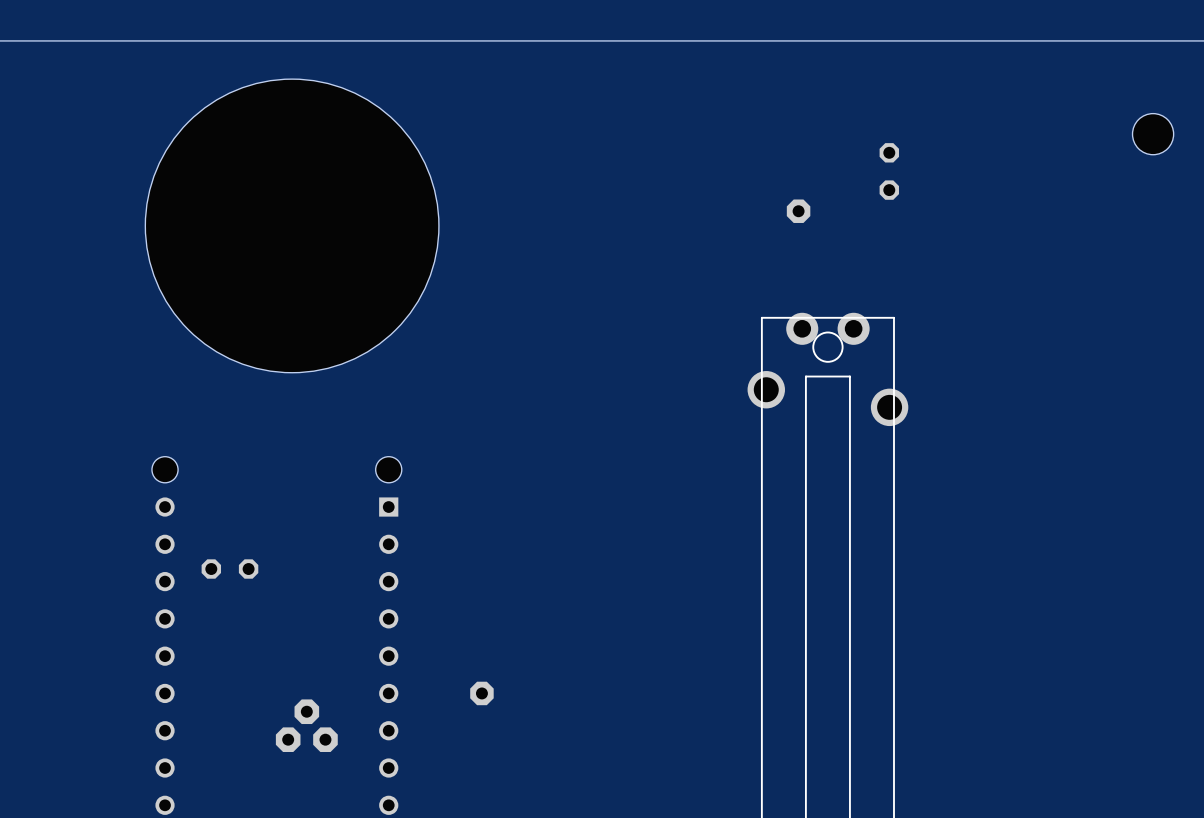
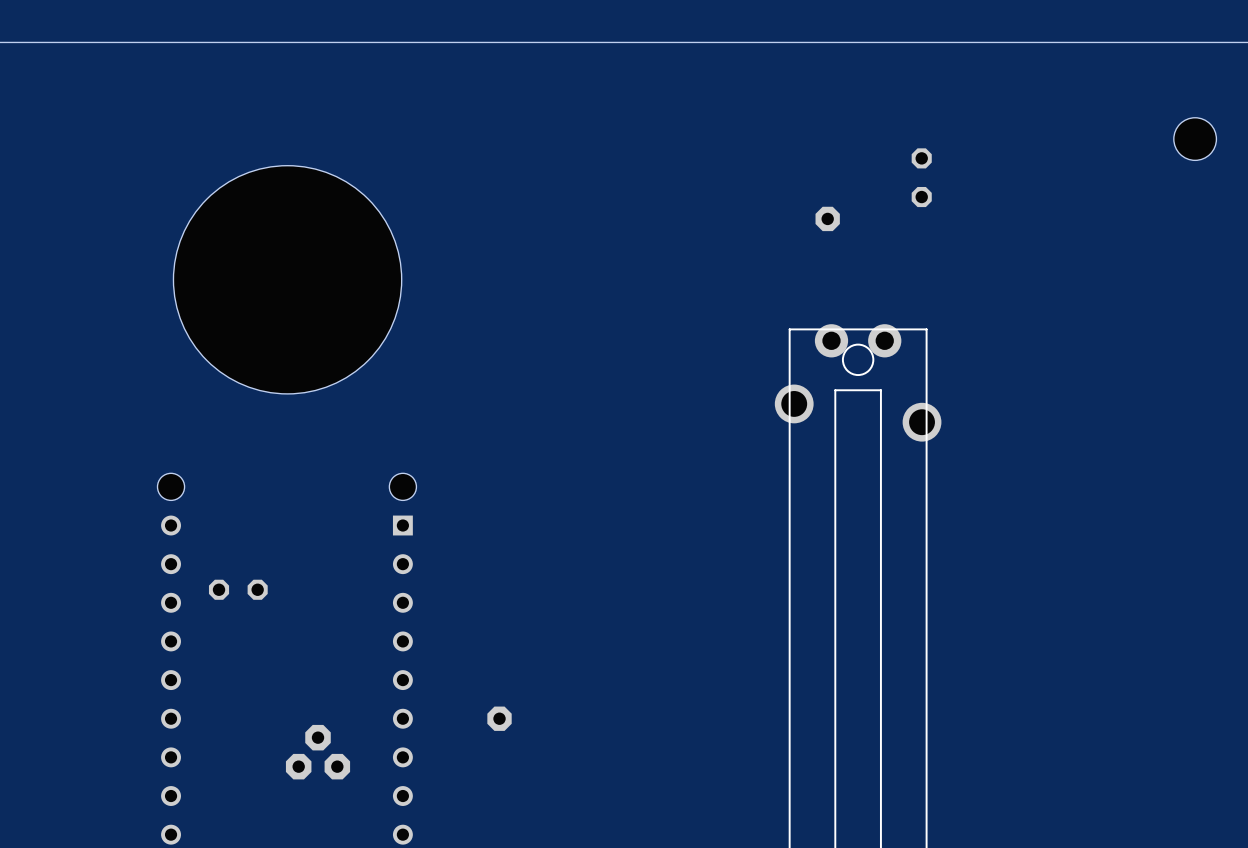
hole: (292, 225) -> none
hole: none -> (287, 279)

